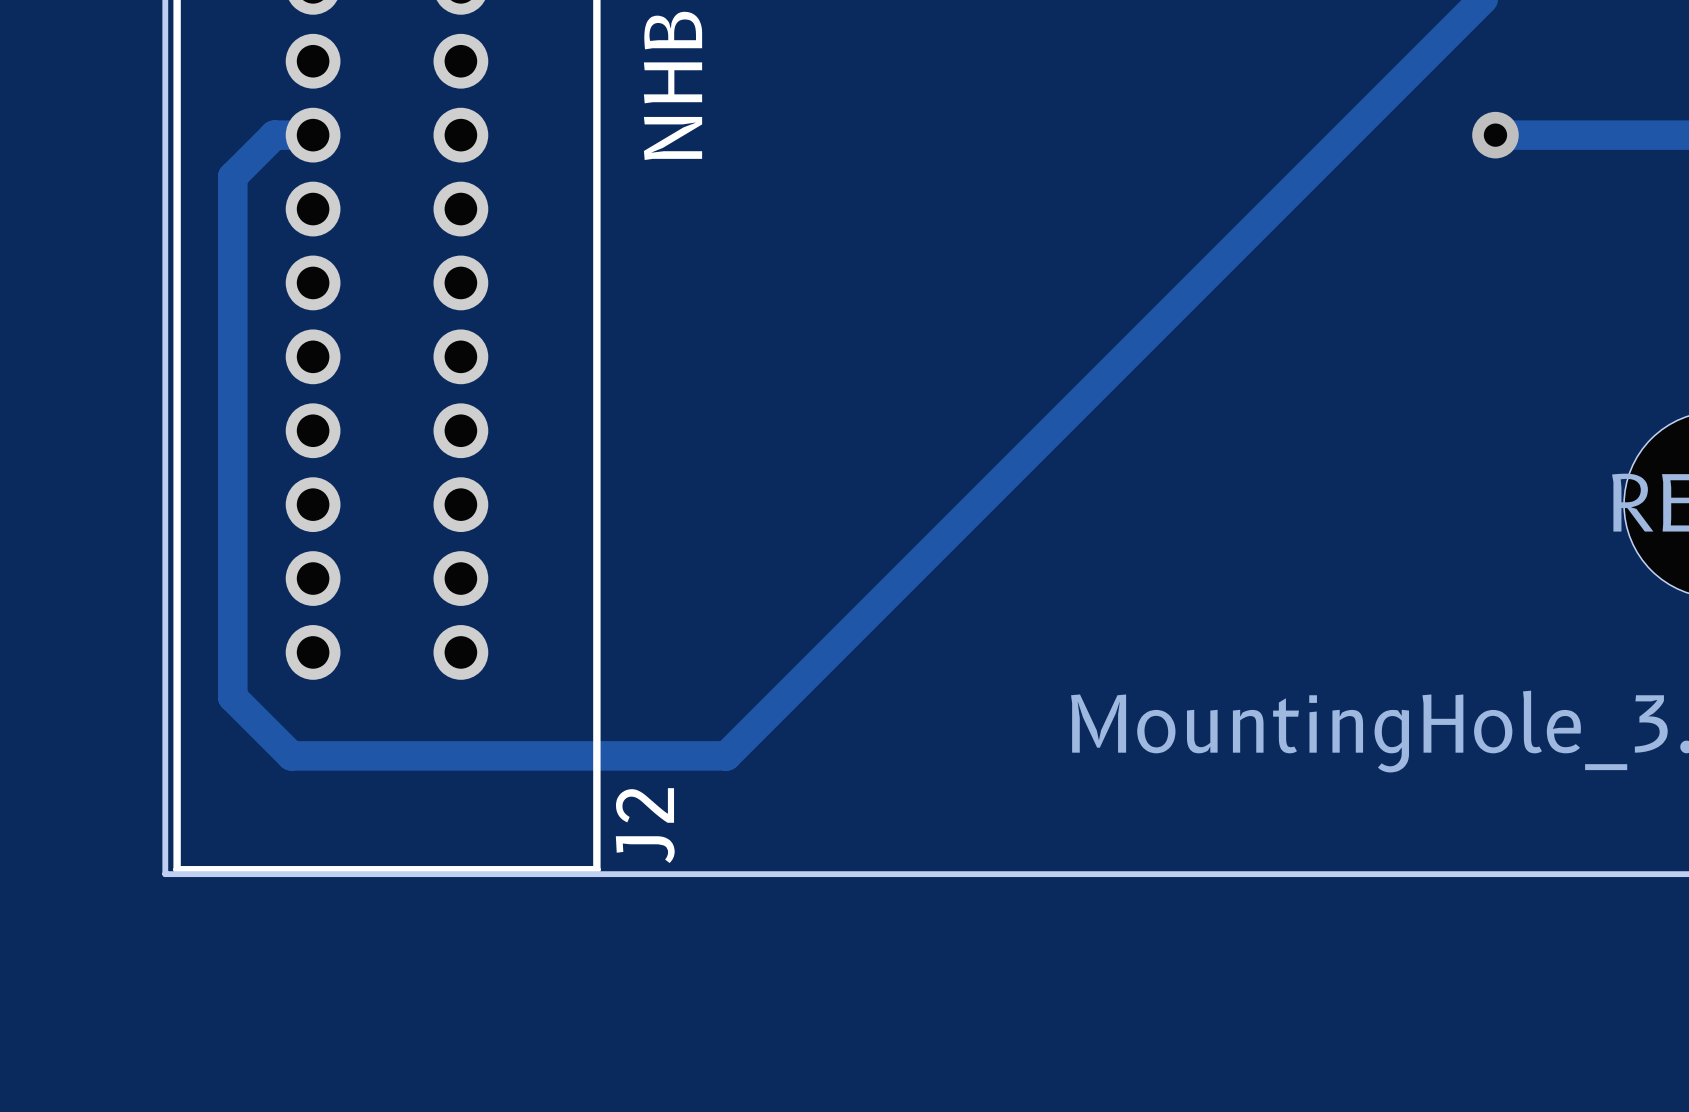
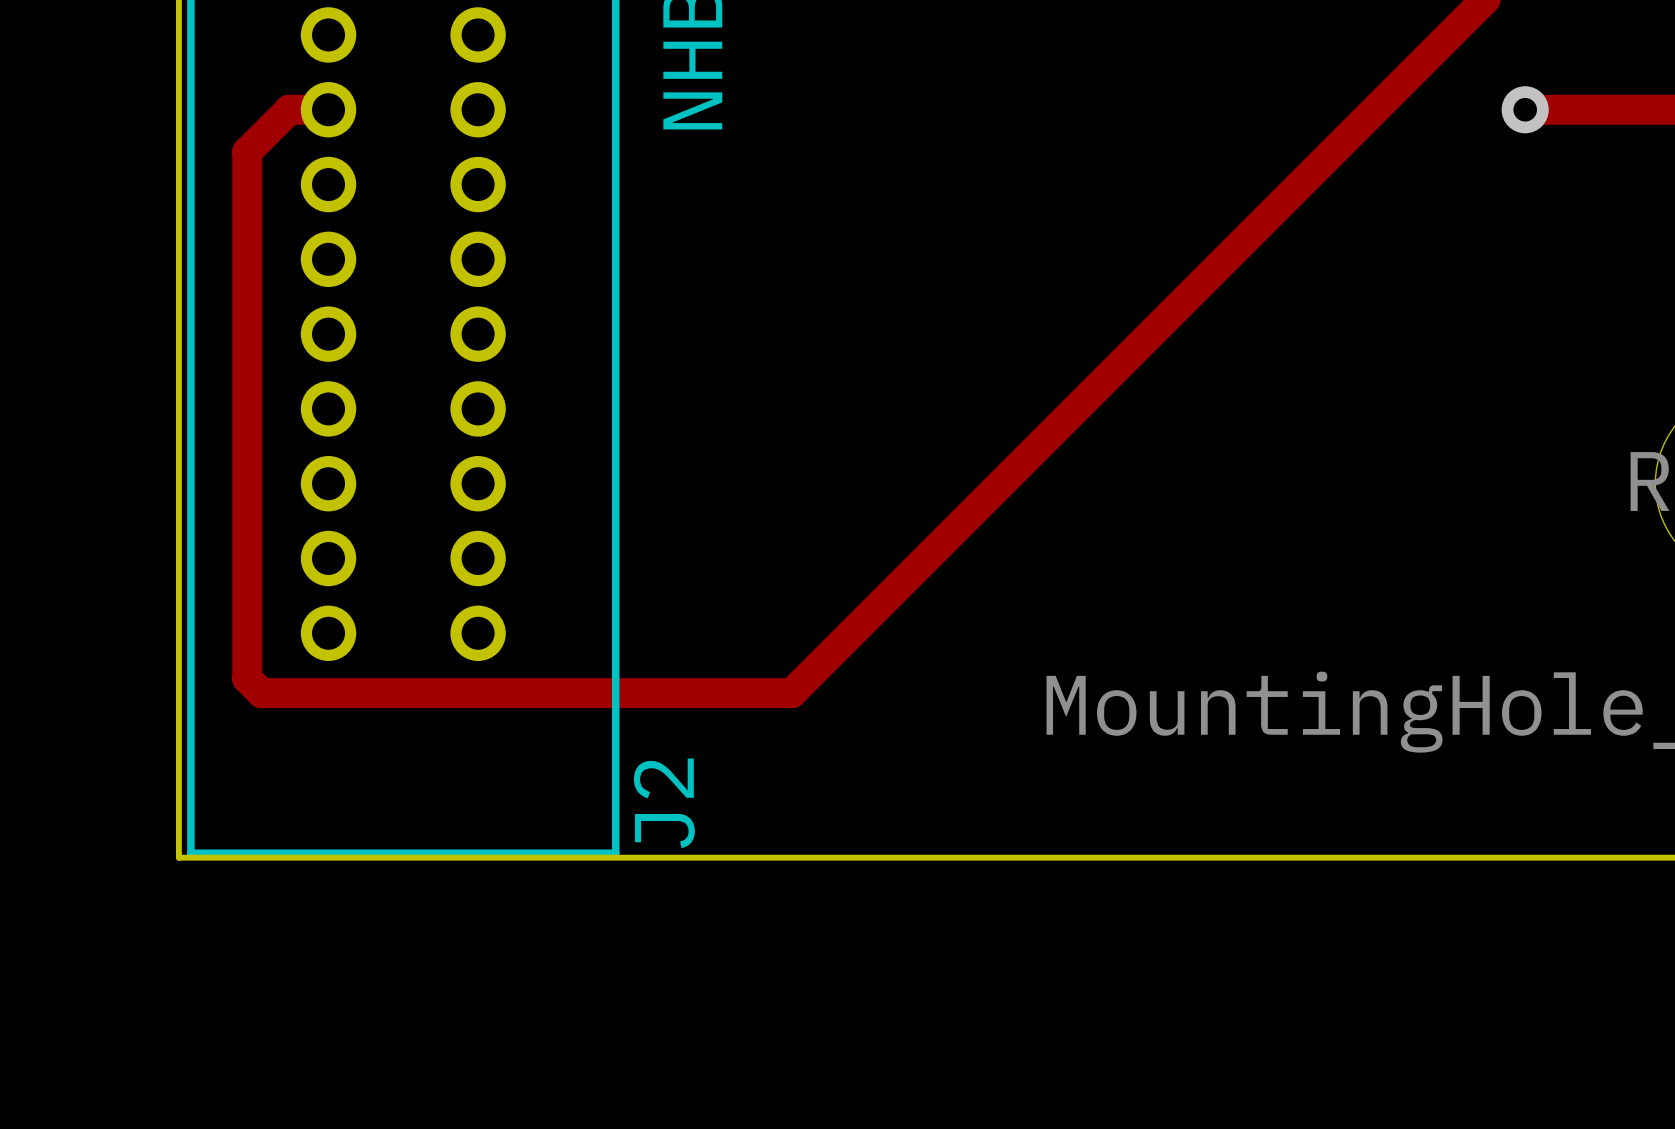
track: (247, 711) (291, 755) (726, 755) (770, 711) -> (261, 693) (791, 693)

